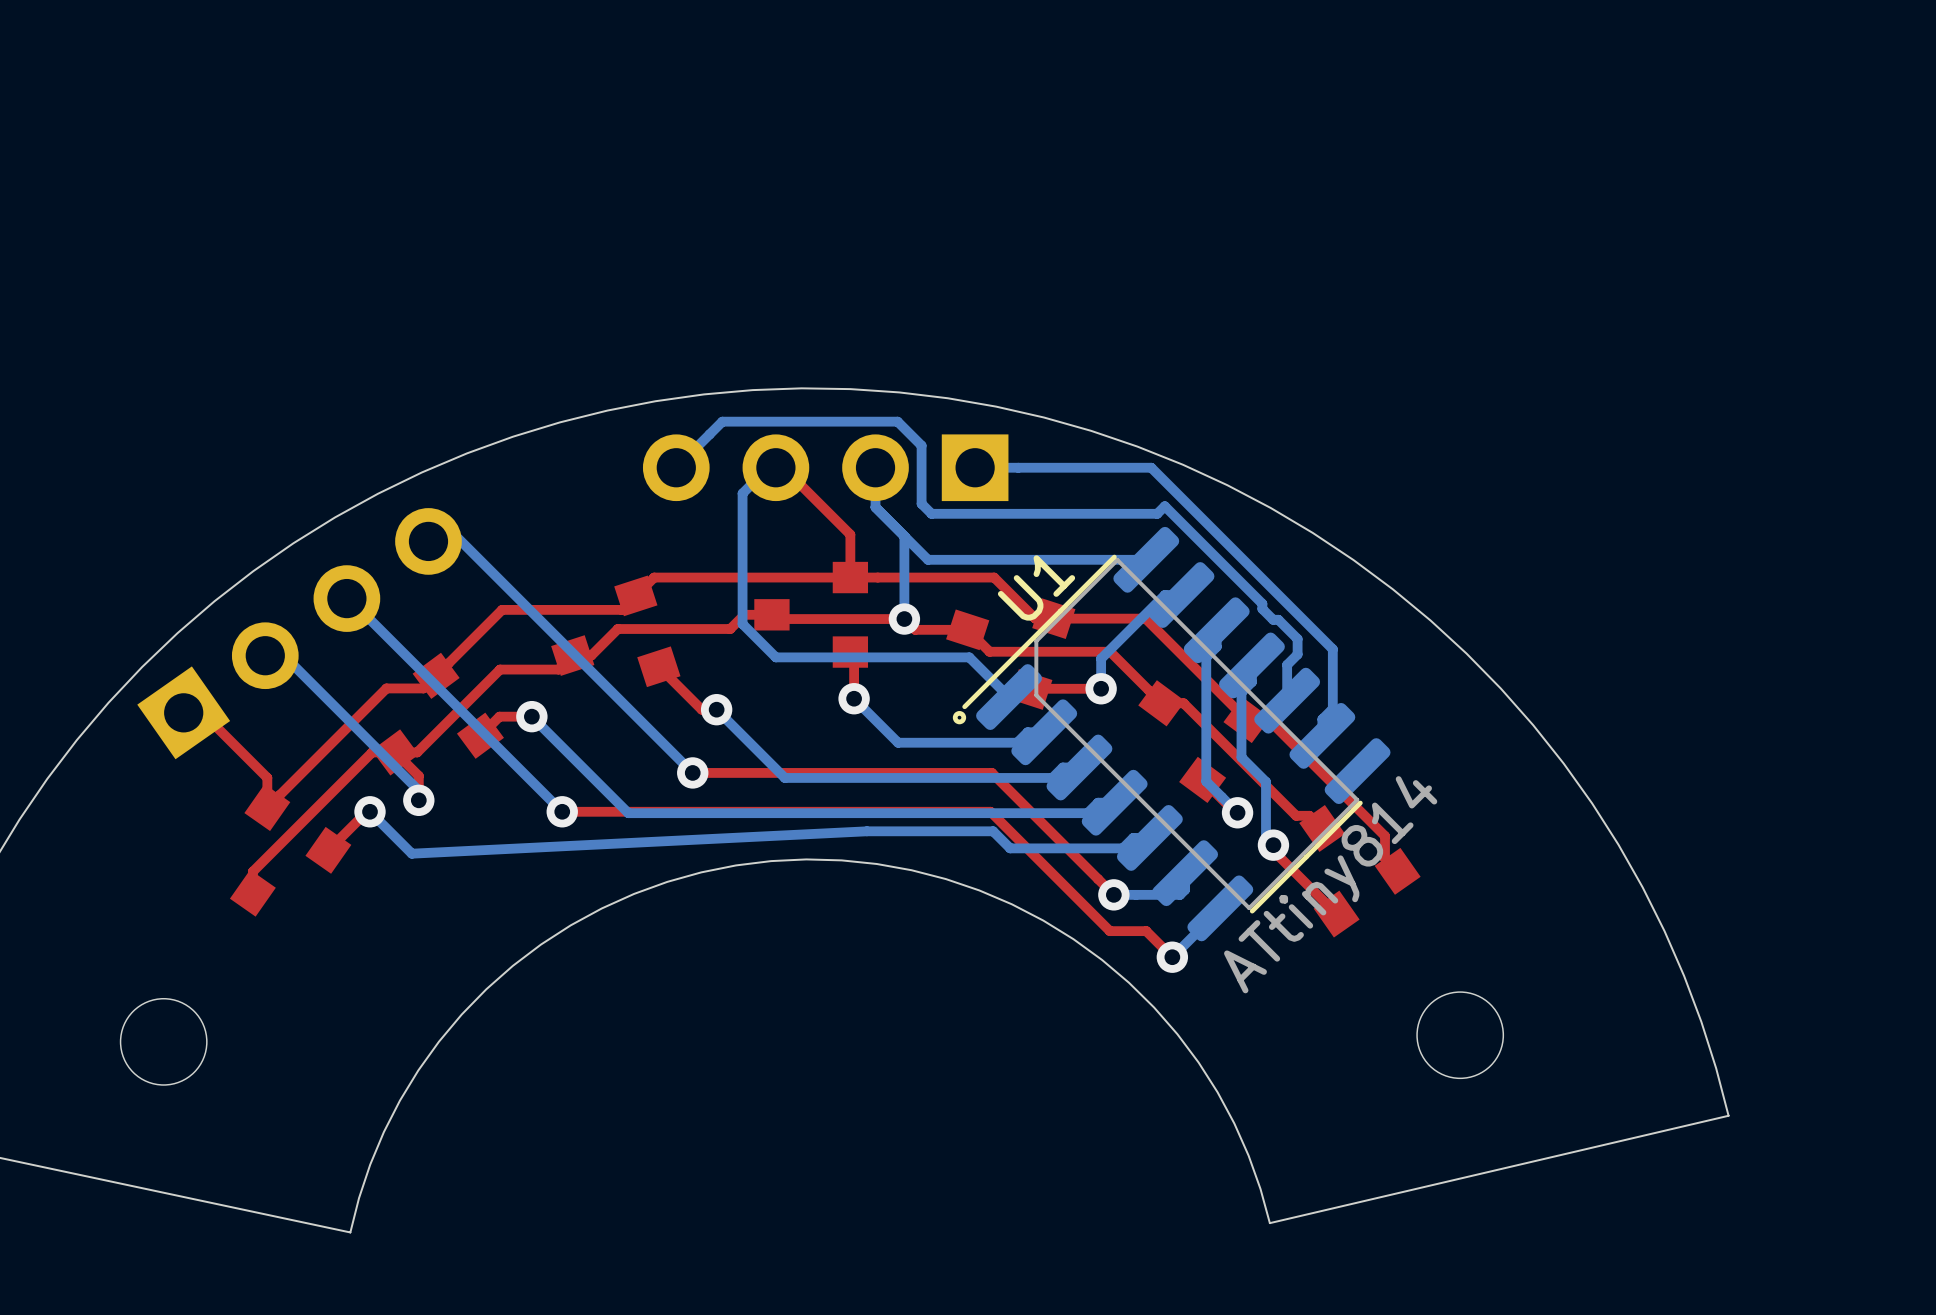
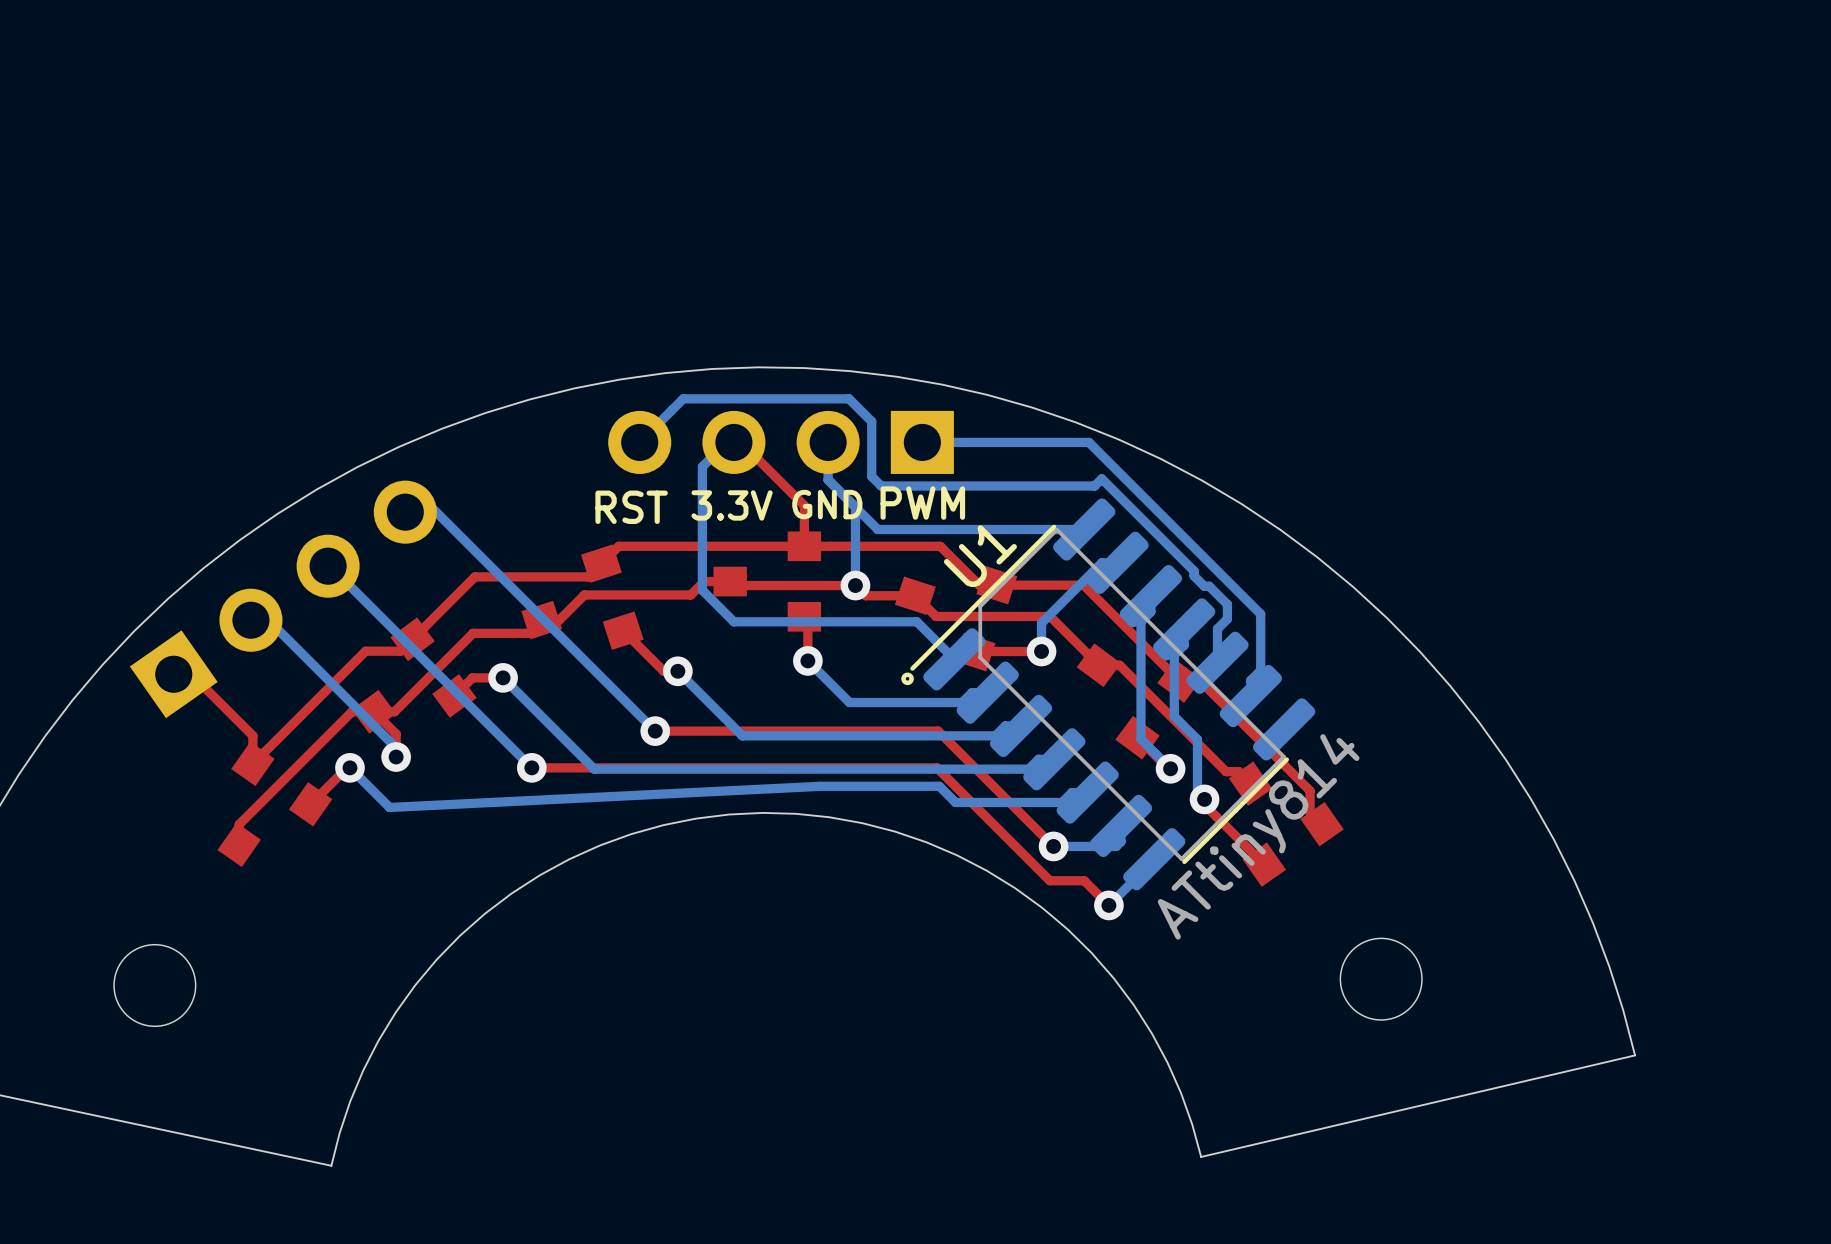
text: none -> PWM (922, 503)
text: none -> GND (827, 504)
text: none -> 3.3V (732, 505)
text: none -> RST (631, 507)

